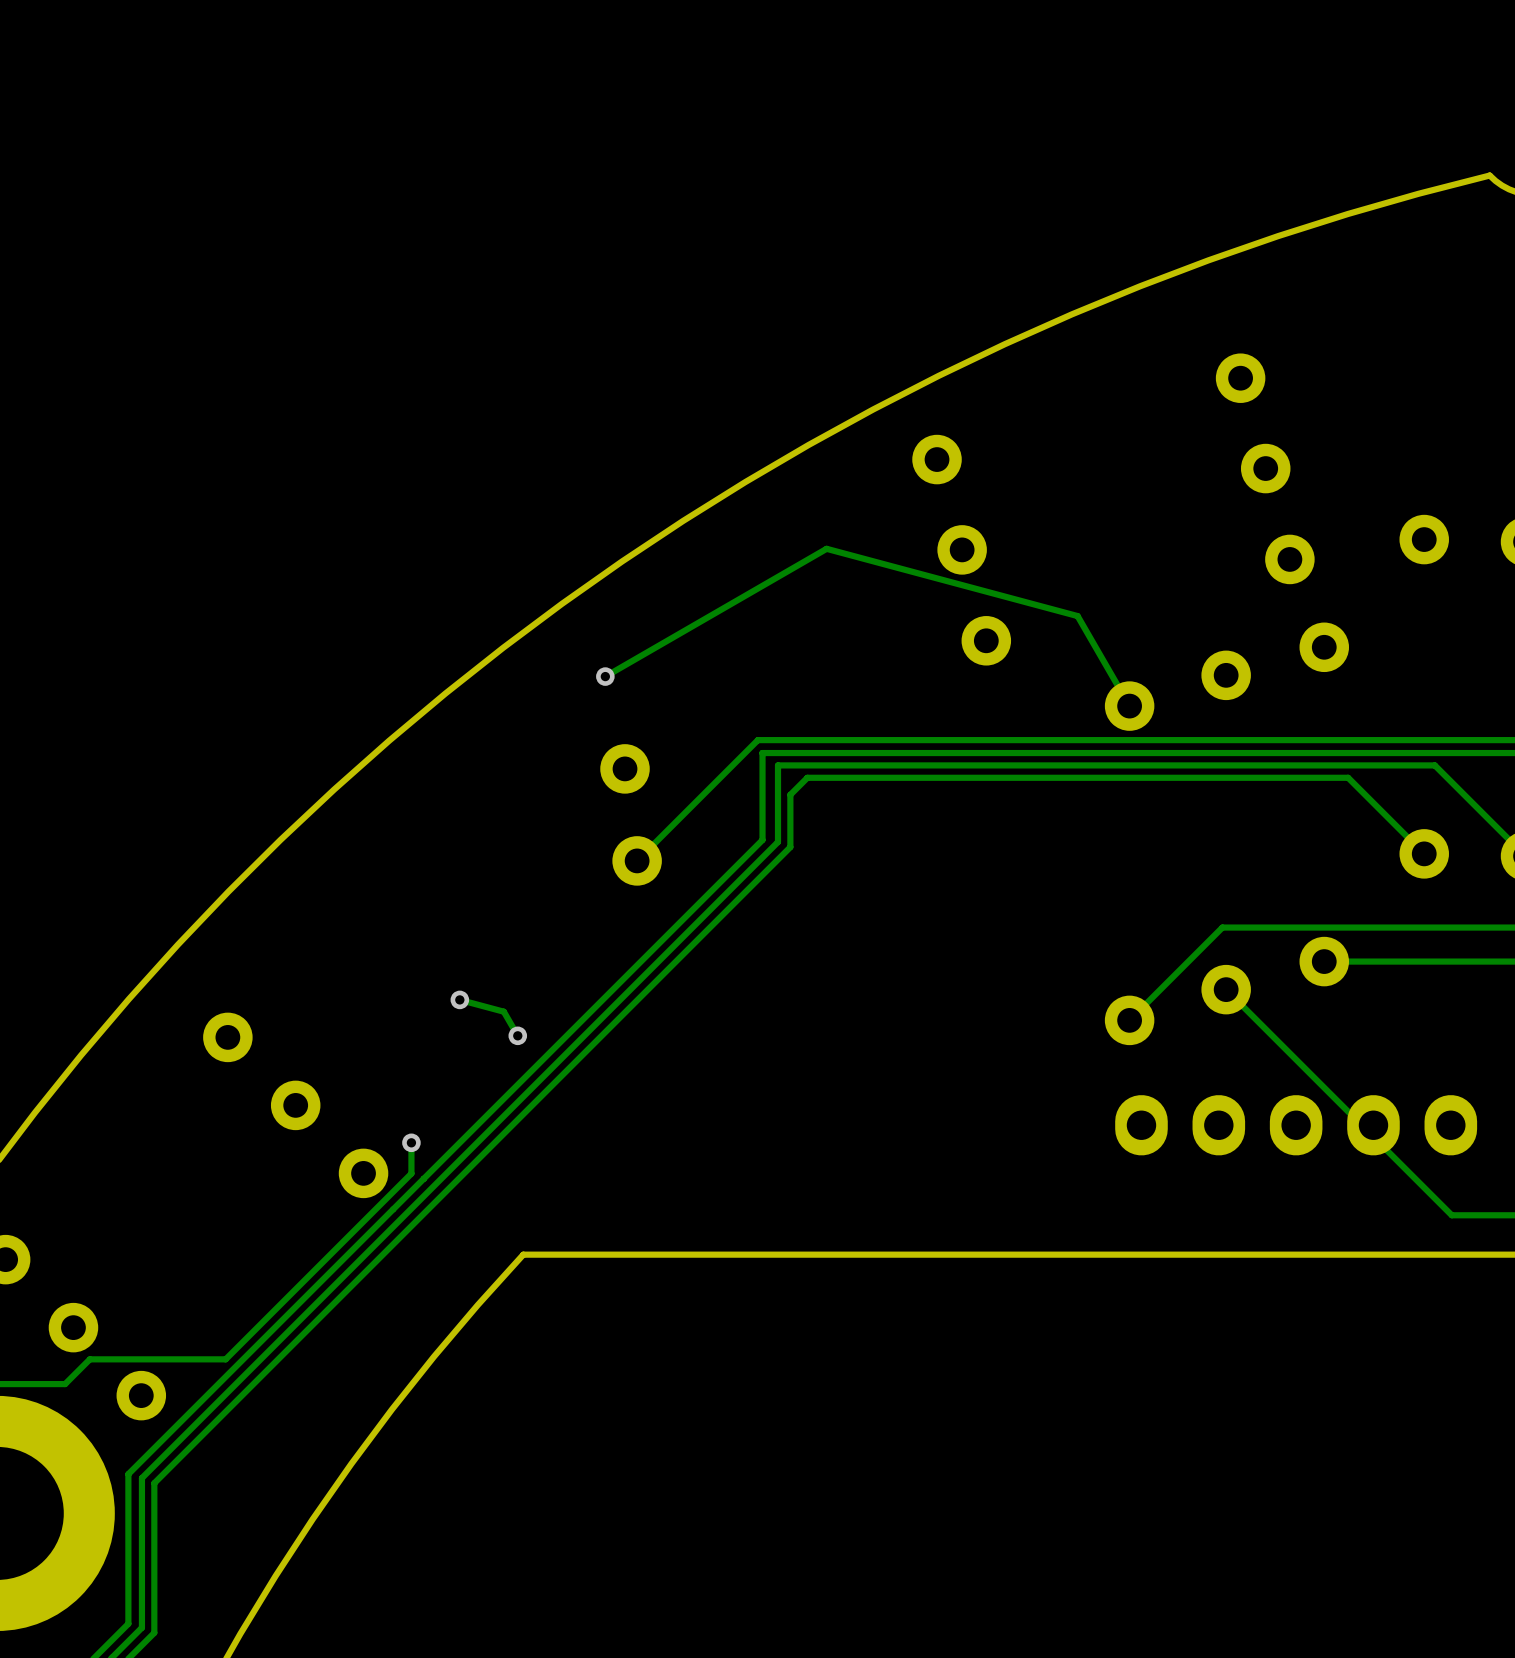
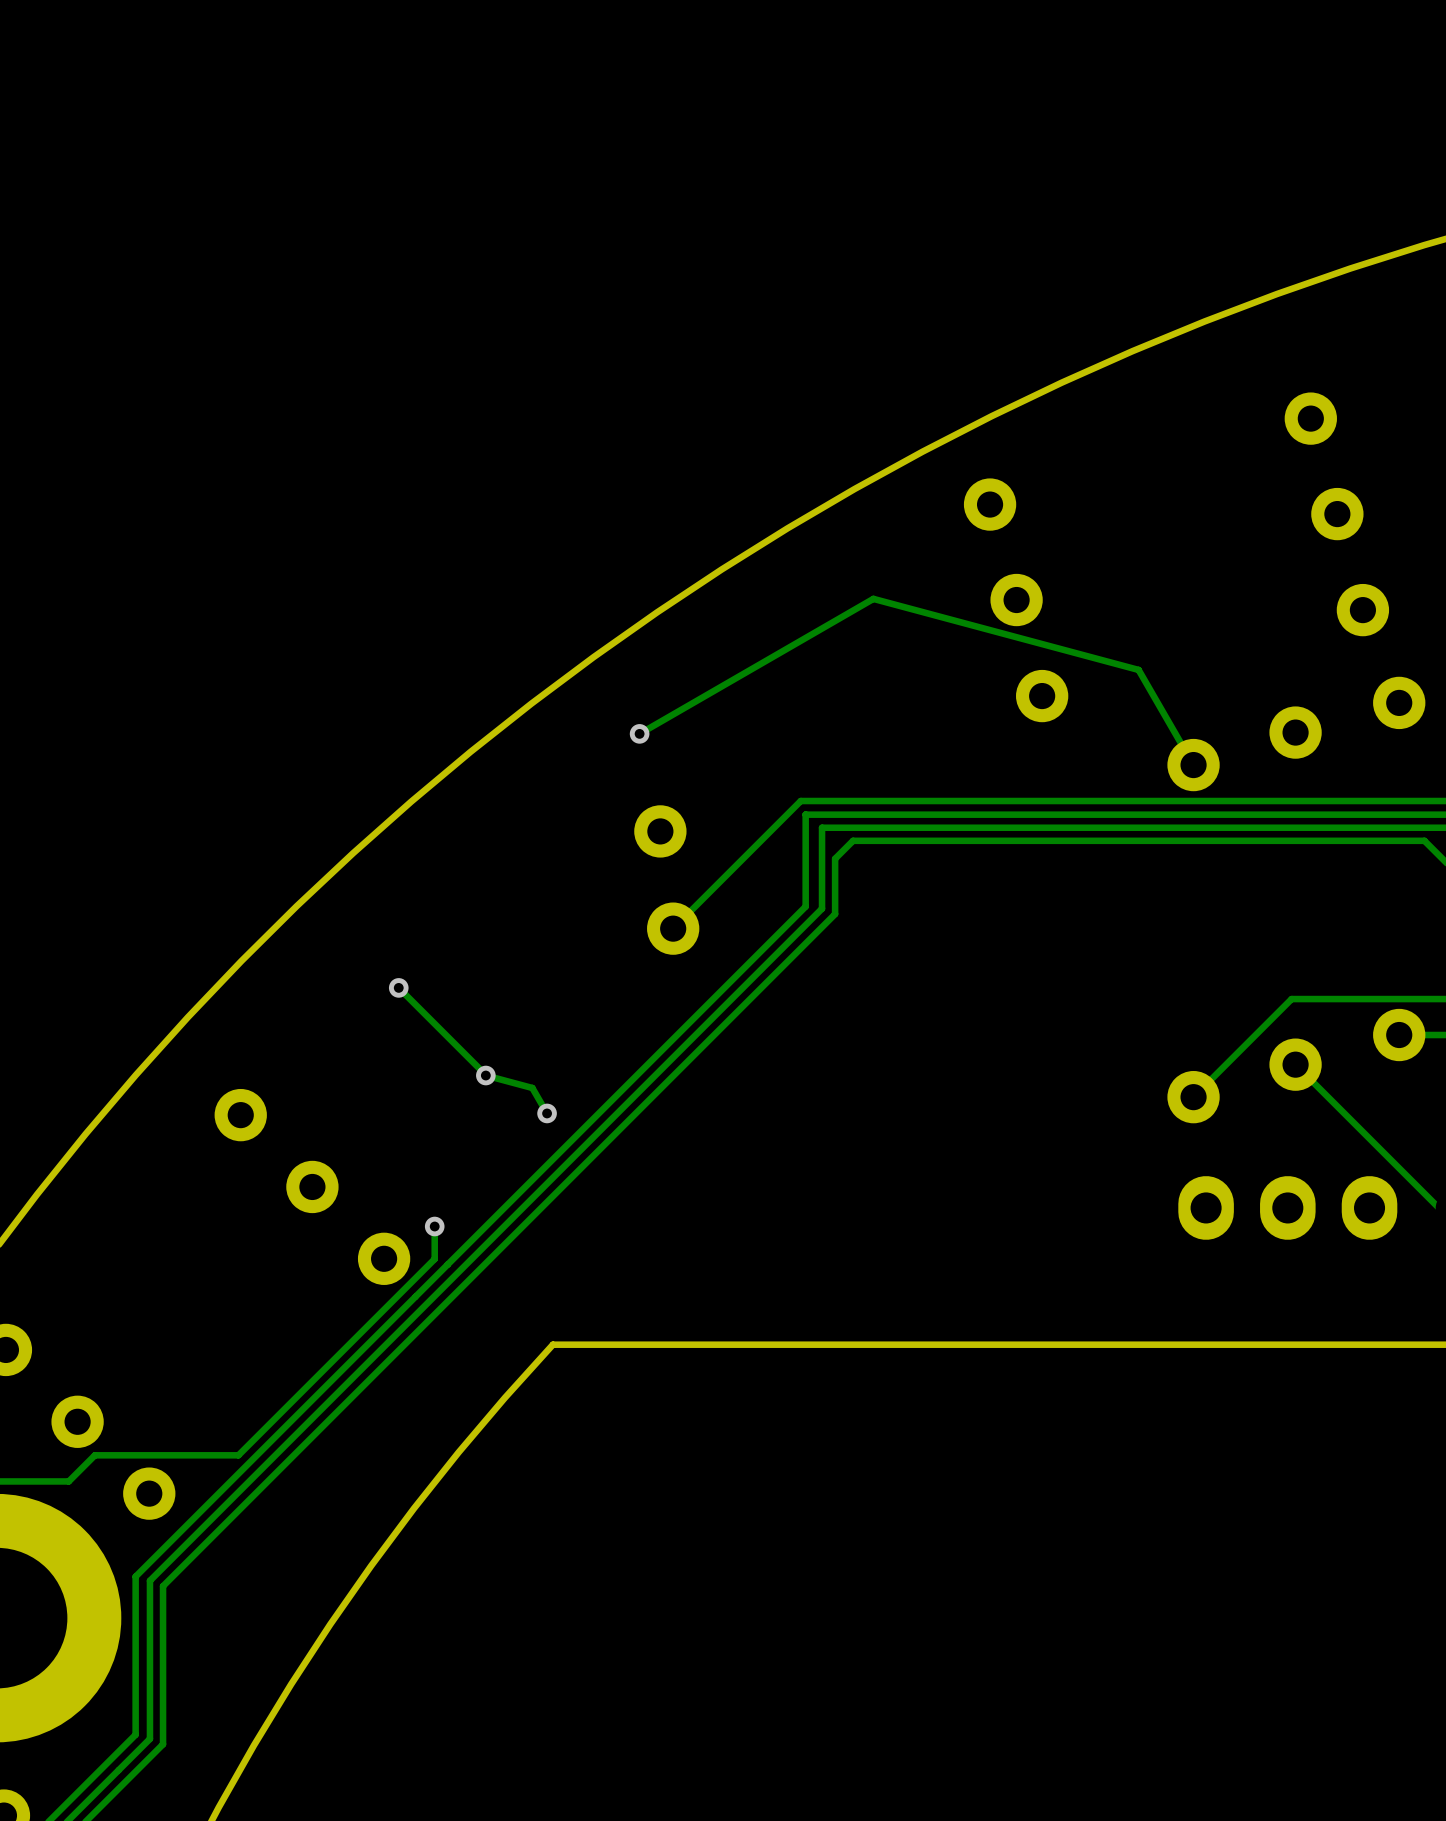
track: none -> (398, 987) (485, 1074)
via: none -> (398, 987)

